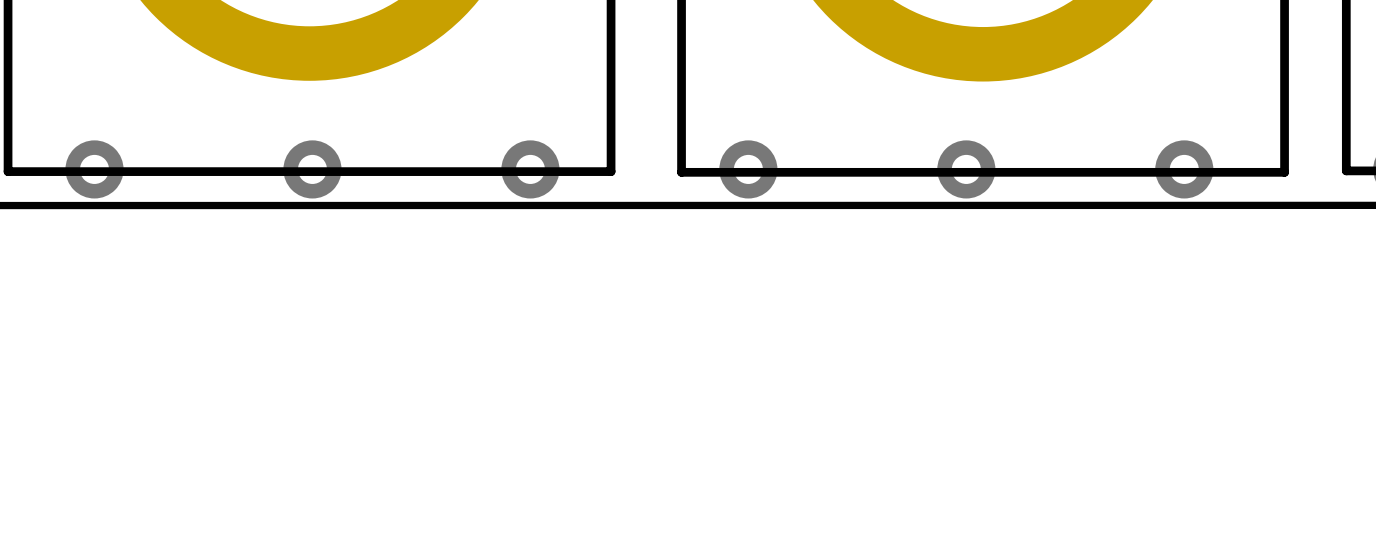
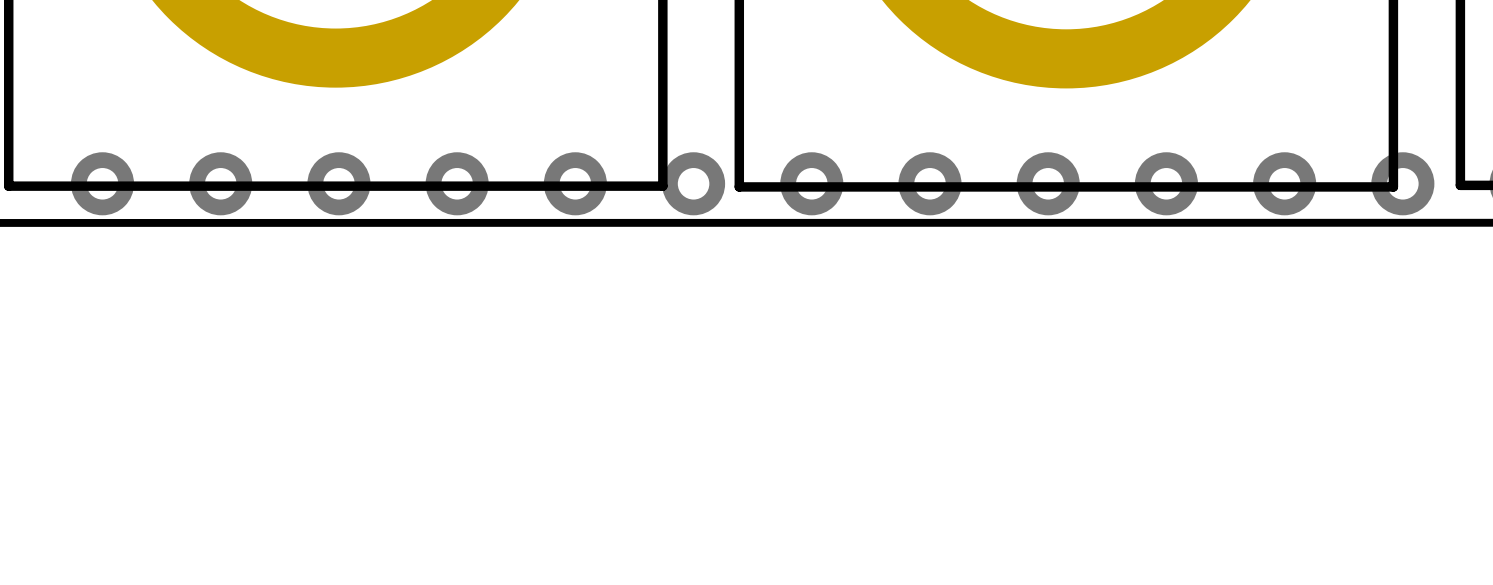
via: none -> (220, 183)
via: none -> (457, 183)
via: none -> (693, 183)
via: none -> (930, 183)
via: none -> (1166, 183)
via: none -> (1402, 183)

